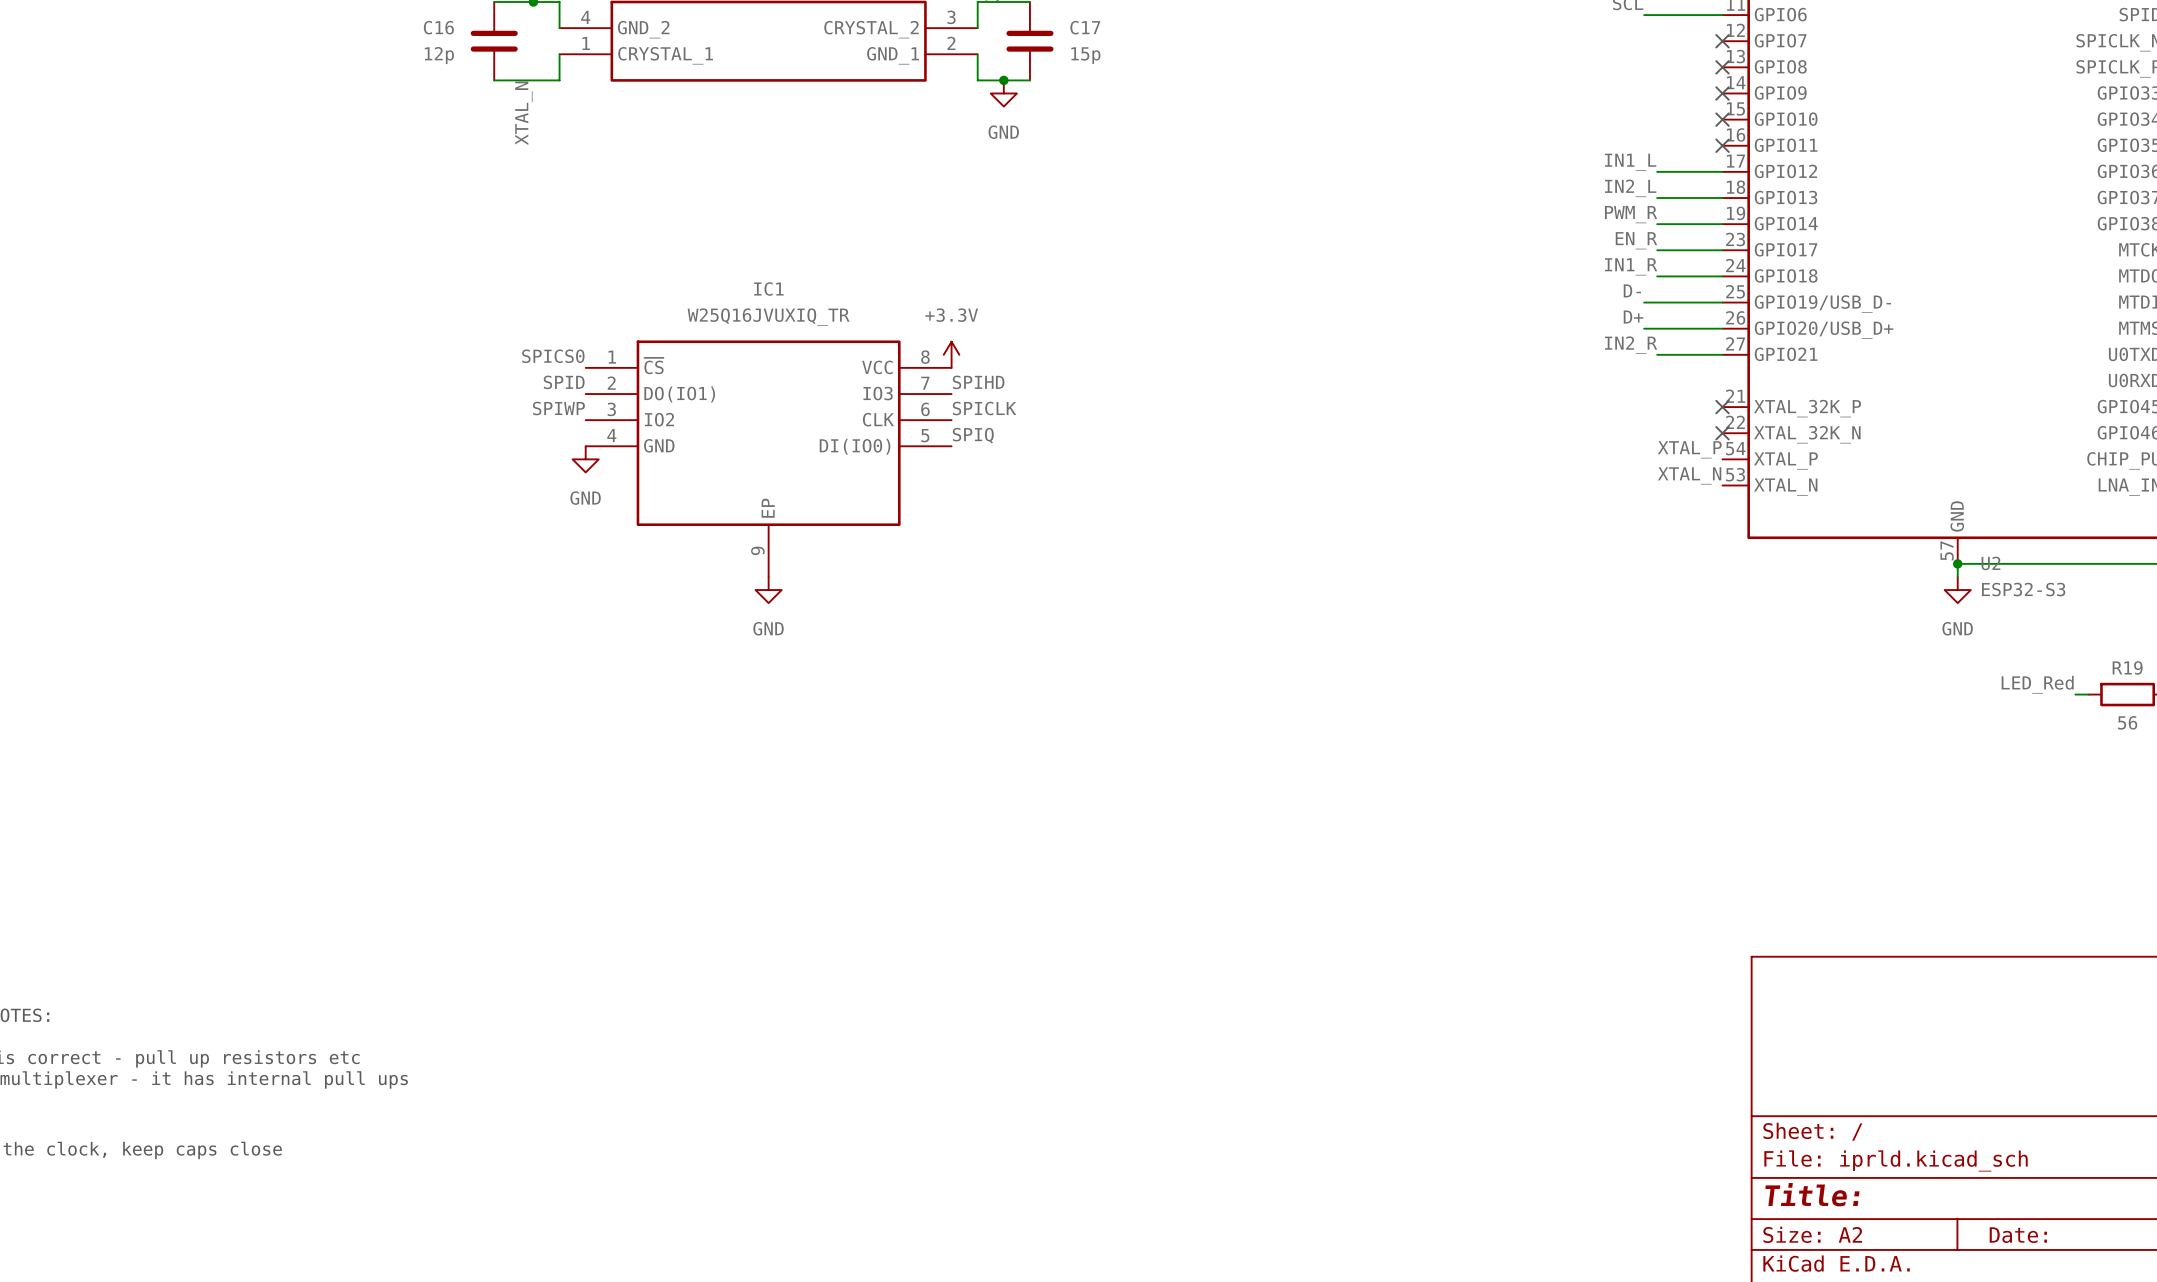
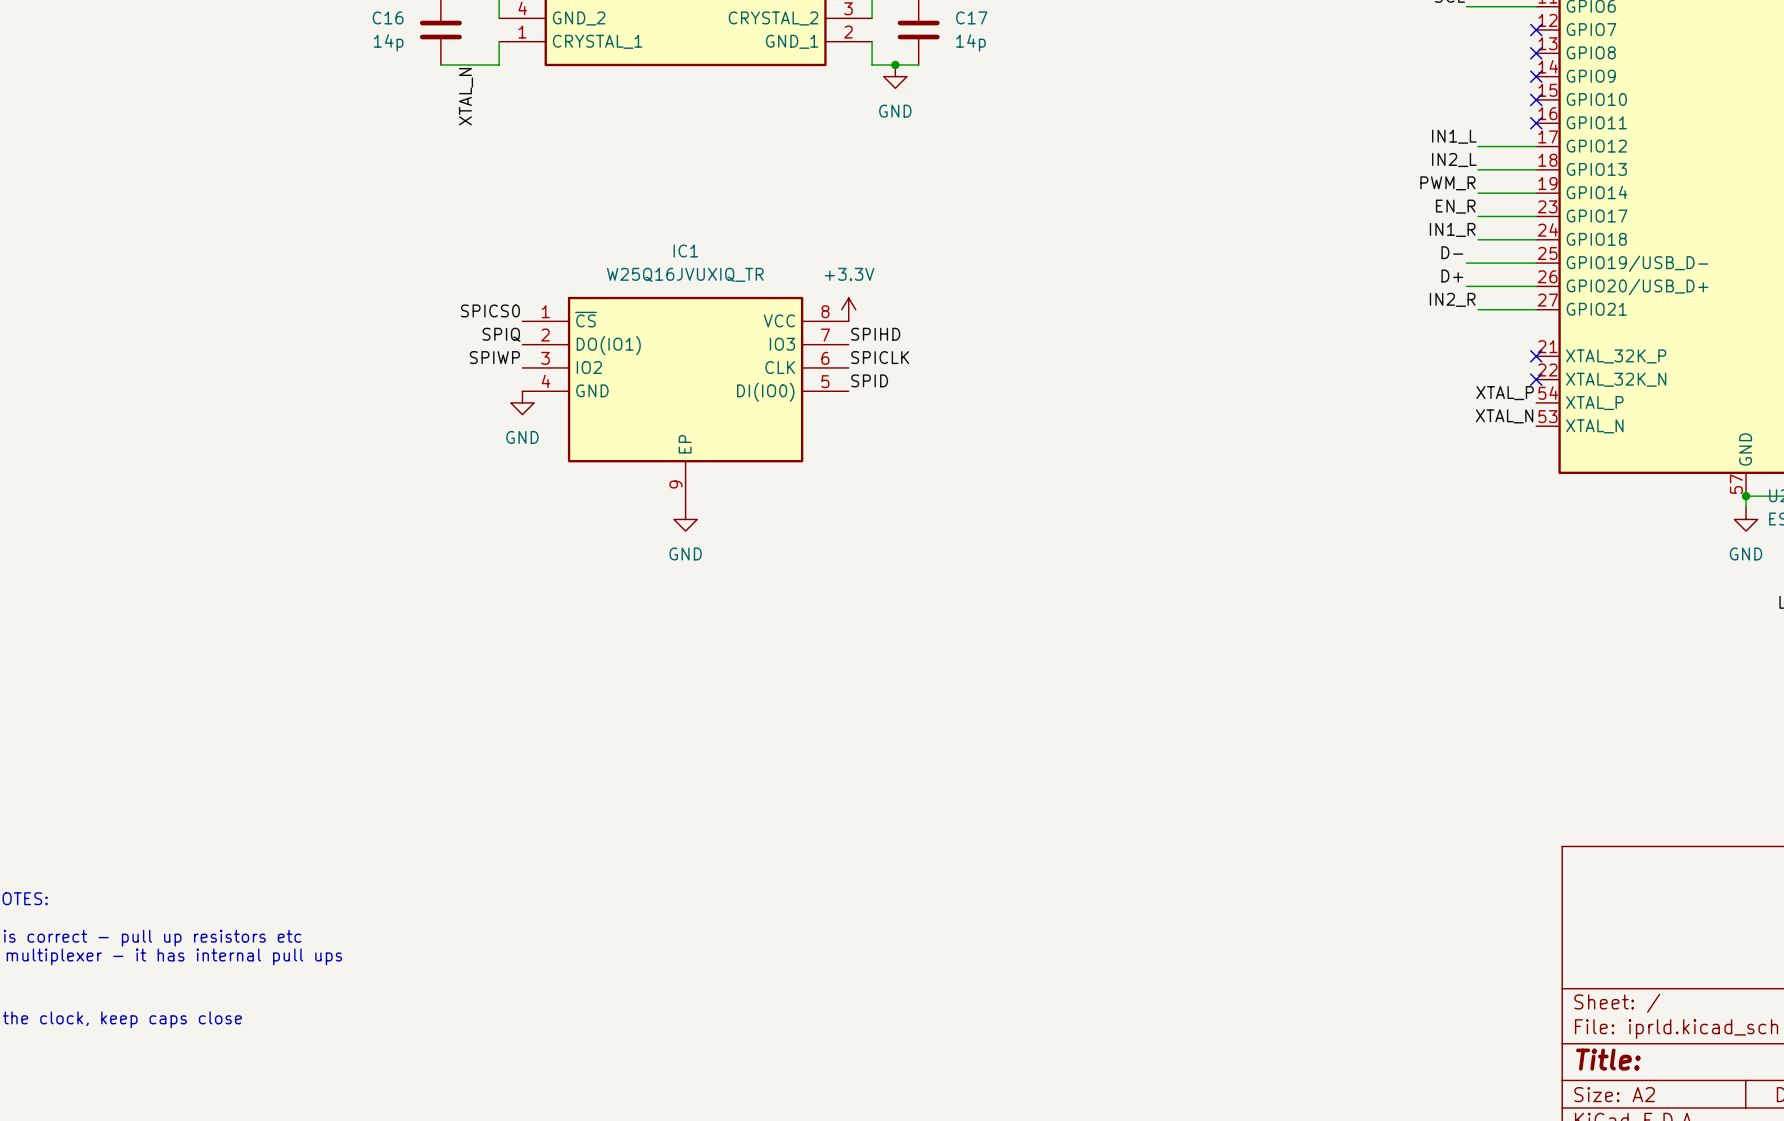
C16 value: 12p (439, 55) -> 14p (388, 42)
C17 value: 15p (1085, 55) -> 14p (970, 42)
label: SPID (564, 382) -> SPIQ (501, 334)
label: SPIQ (973, 435) -> SPID (869, 380)

